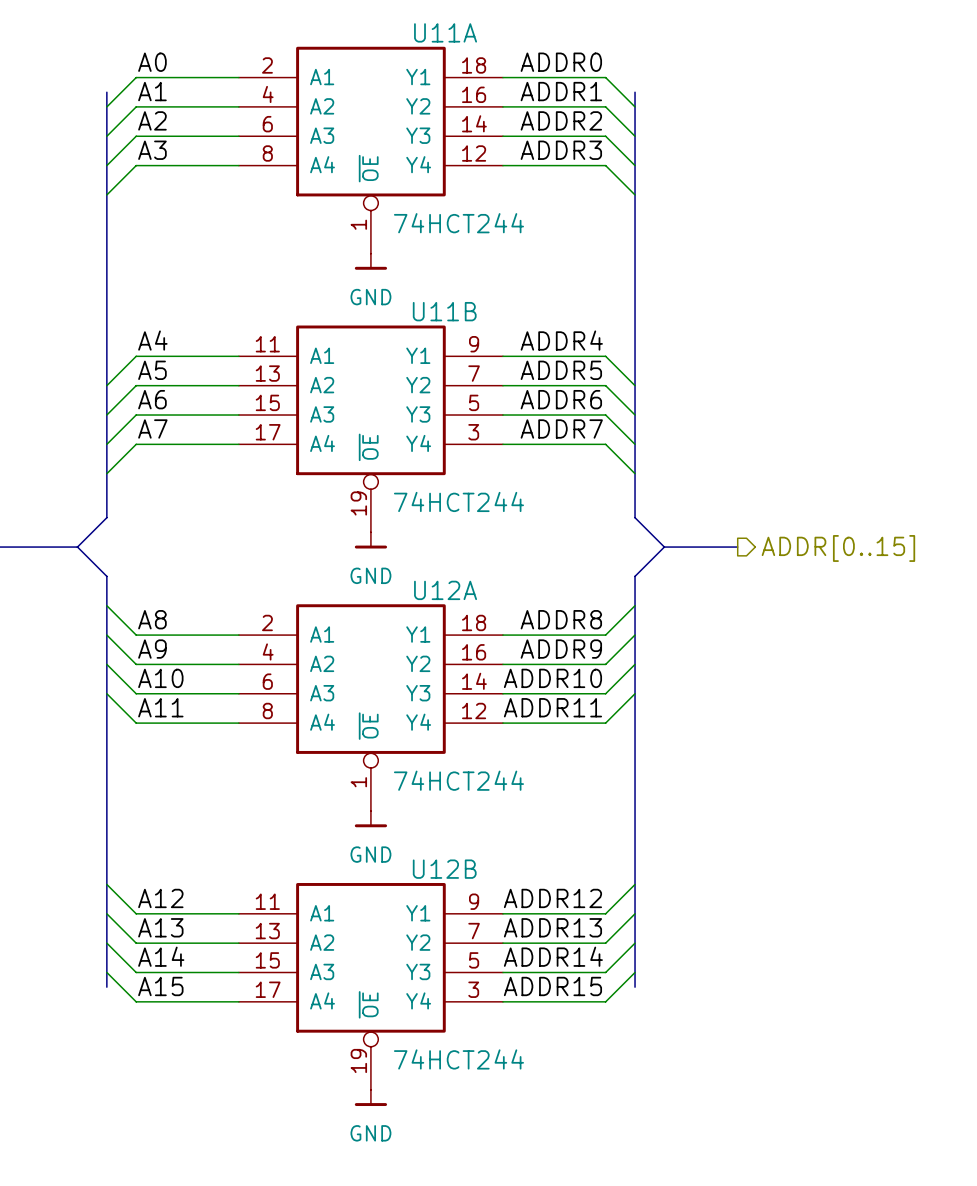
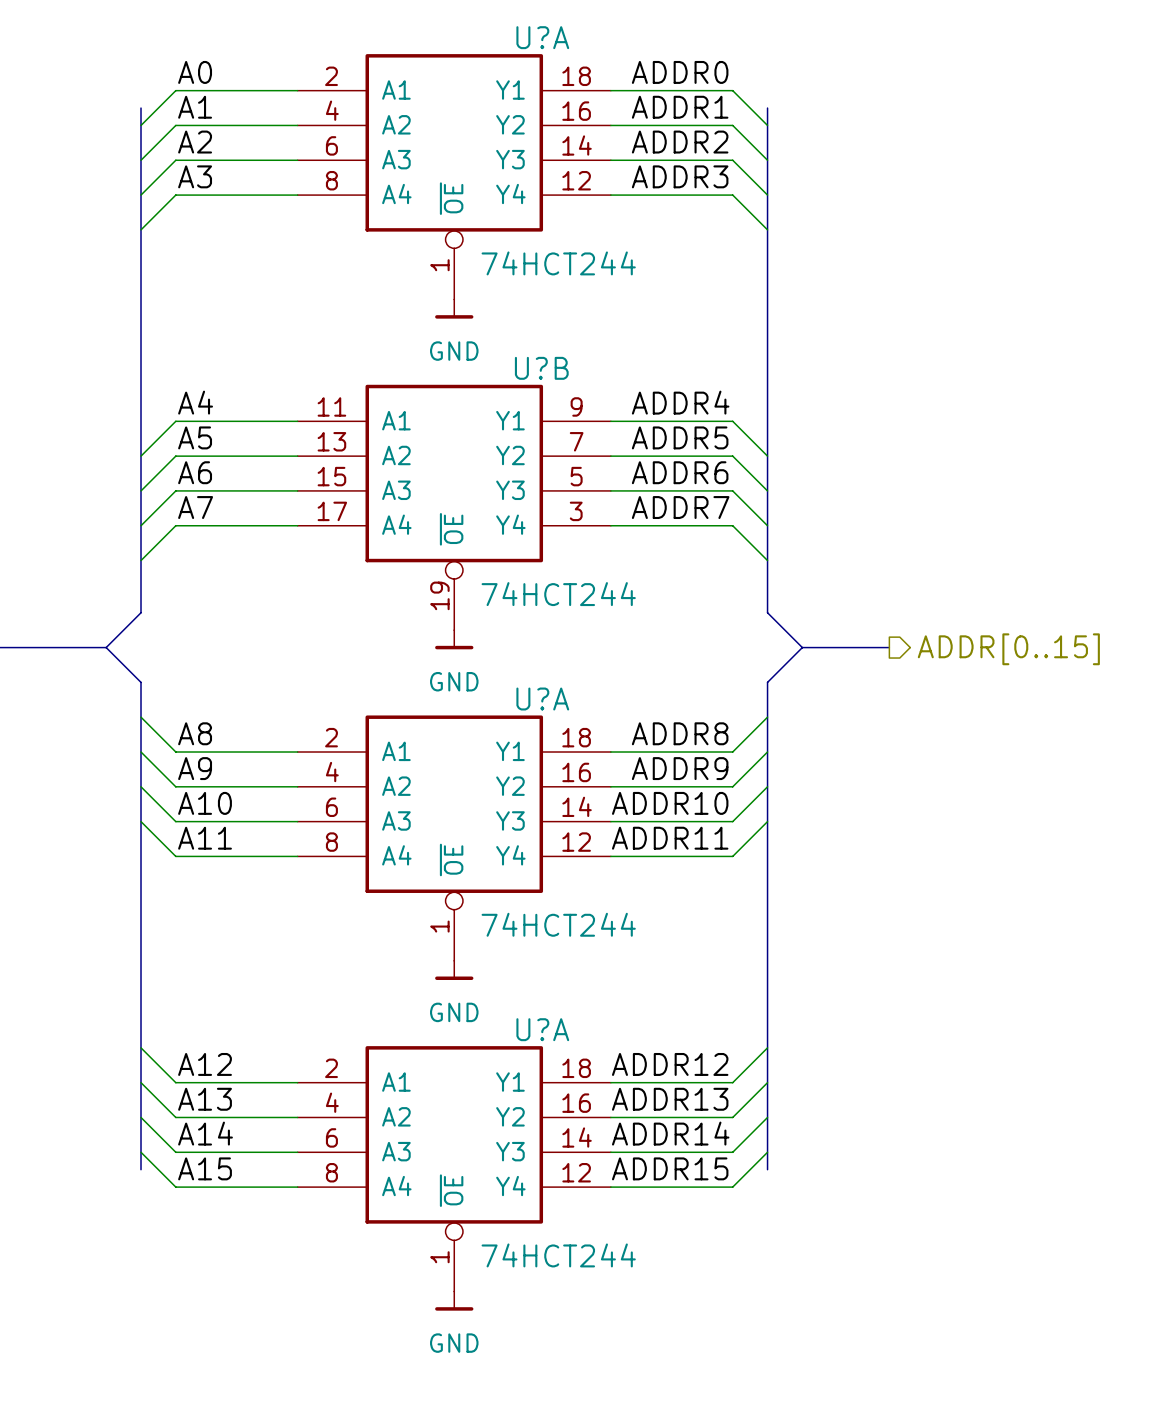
U11A name: U11A (445, 32) -> U?A (542, 37)
U11B name: U11B (444, 311) -> U?B (541, 368)
U12A name: U12A (445, 590) -> U?A (542, 699)
U12B name: U12B (444, 869) -> U?A (542, 1029)
U12B symbol: [238, 883, 503, 1090] -> [297, 1046, 611, 1292]

